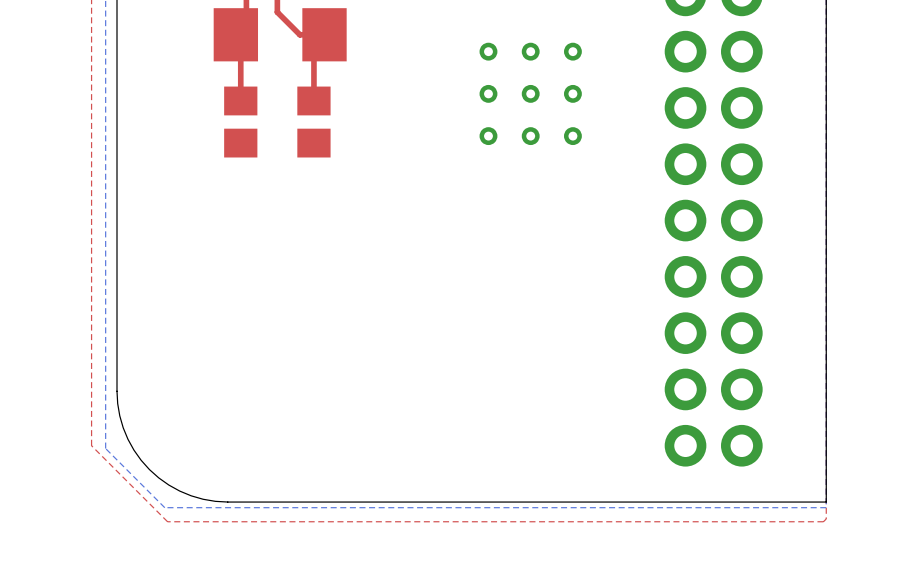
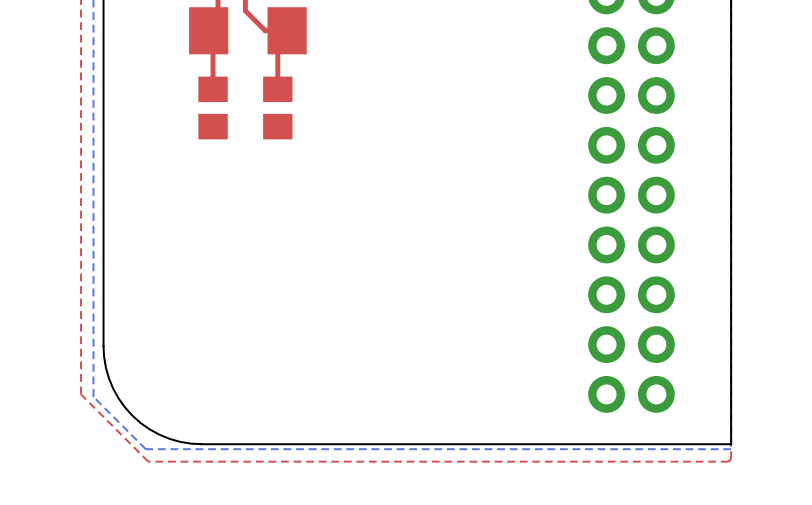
via: (488, 51) -> none
via: (530, 51) -> none
via: (572, 51) -> none
via: (488, 93) -> none
via: (530, 93) -> none
via: (572, 93) -> none
via: (488, 136) -> none
via: (530, 136) -> none
via: (572, 136) -> none

